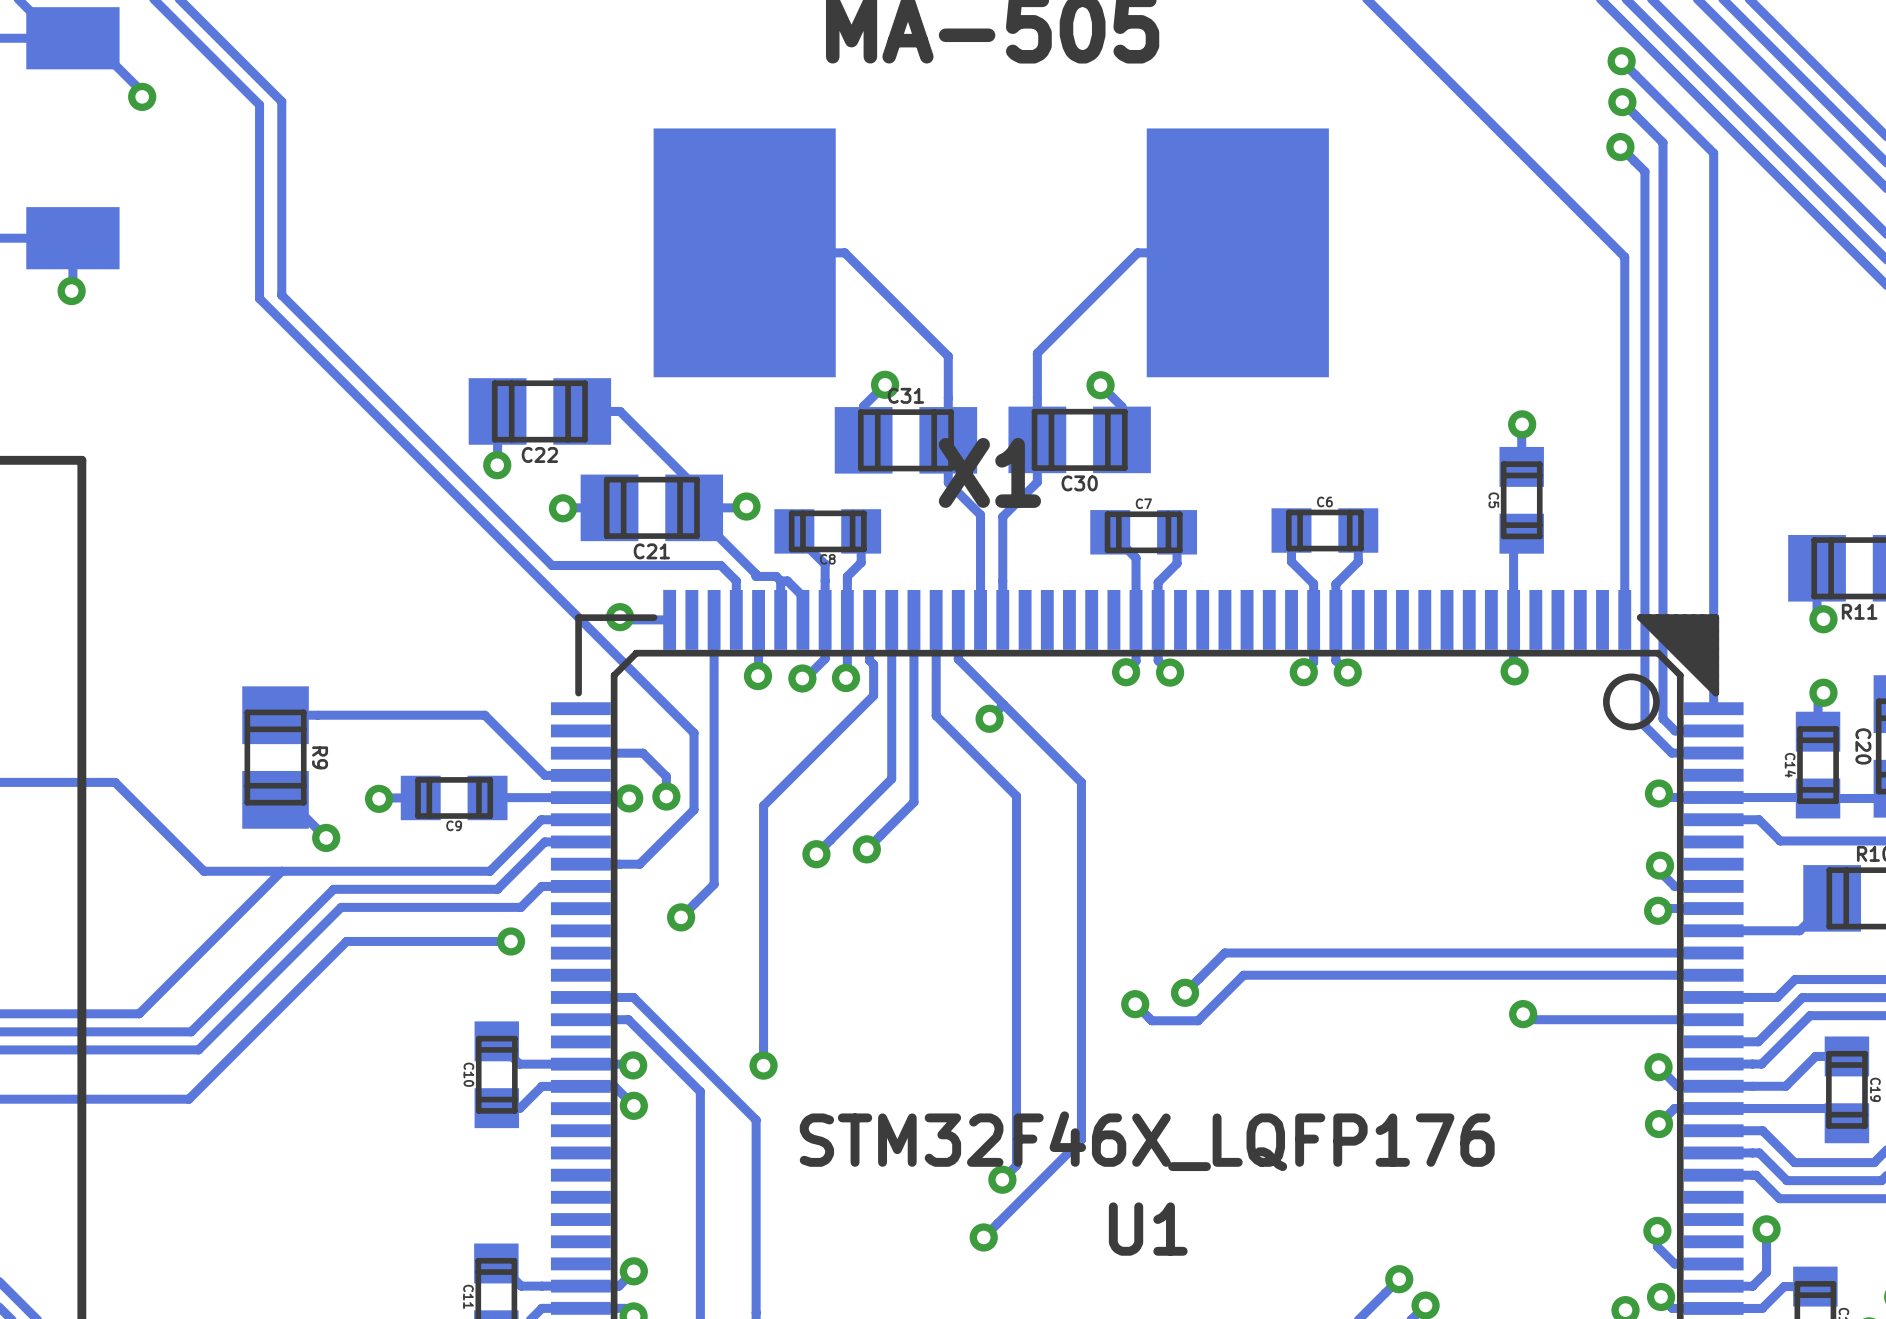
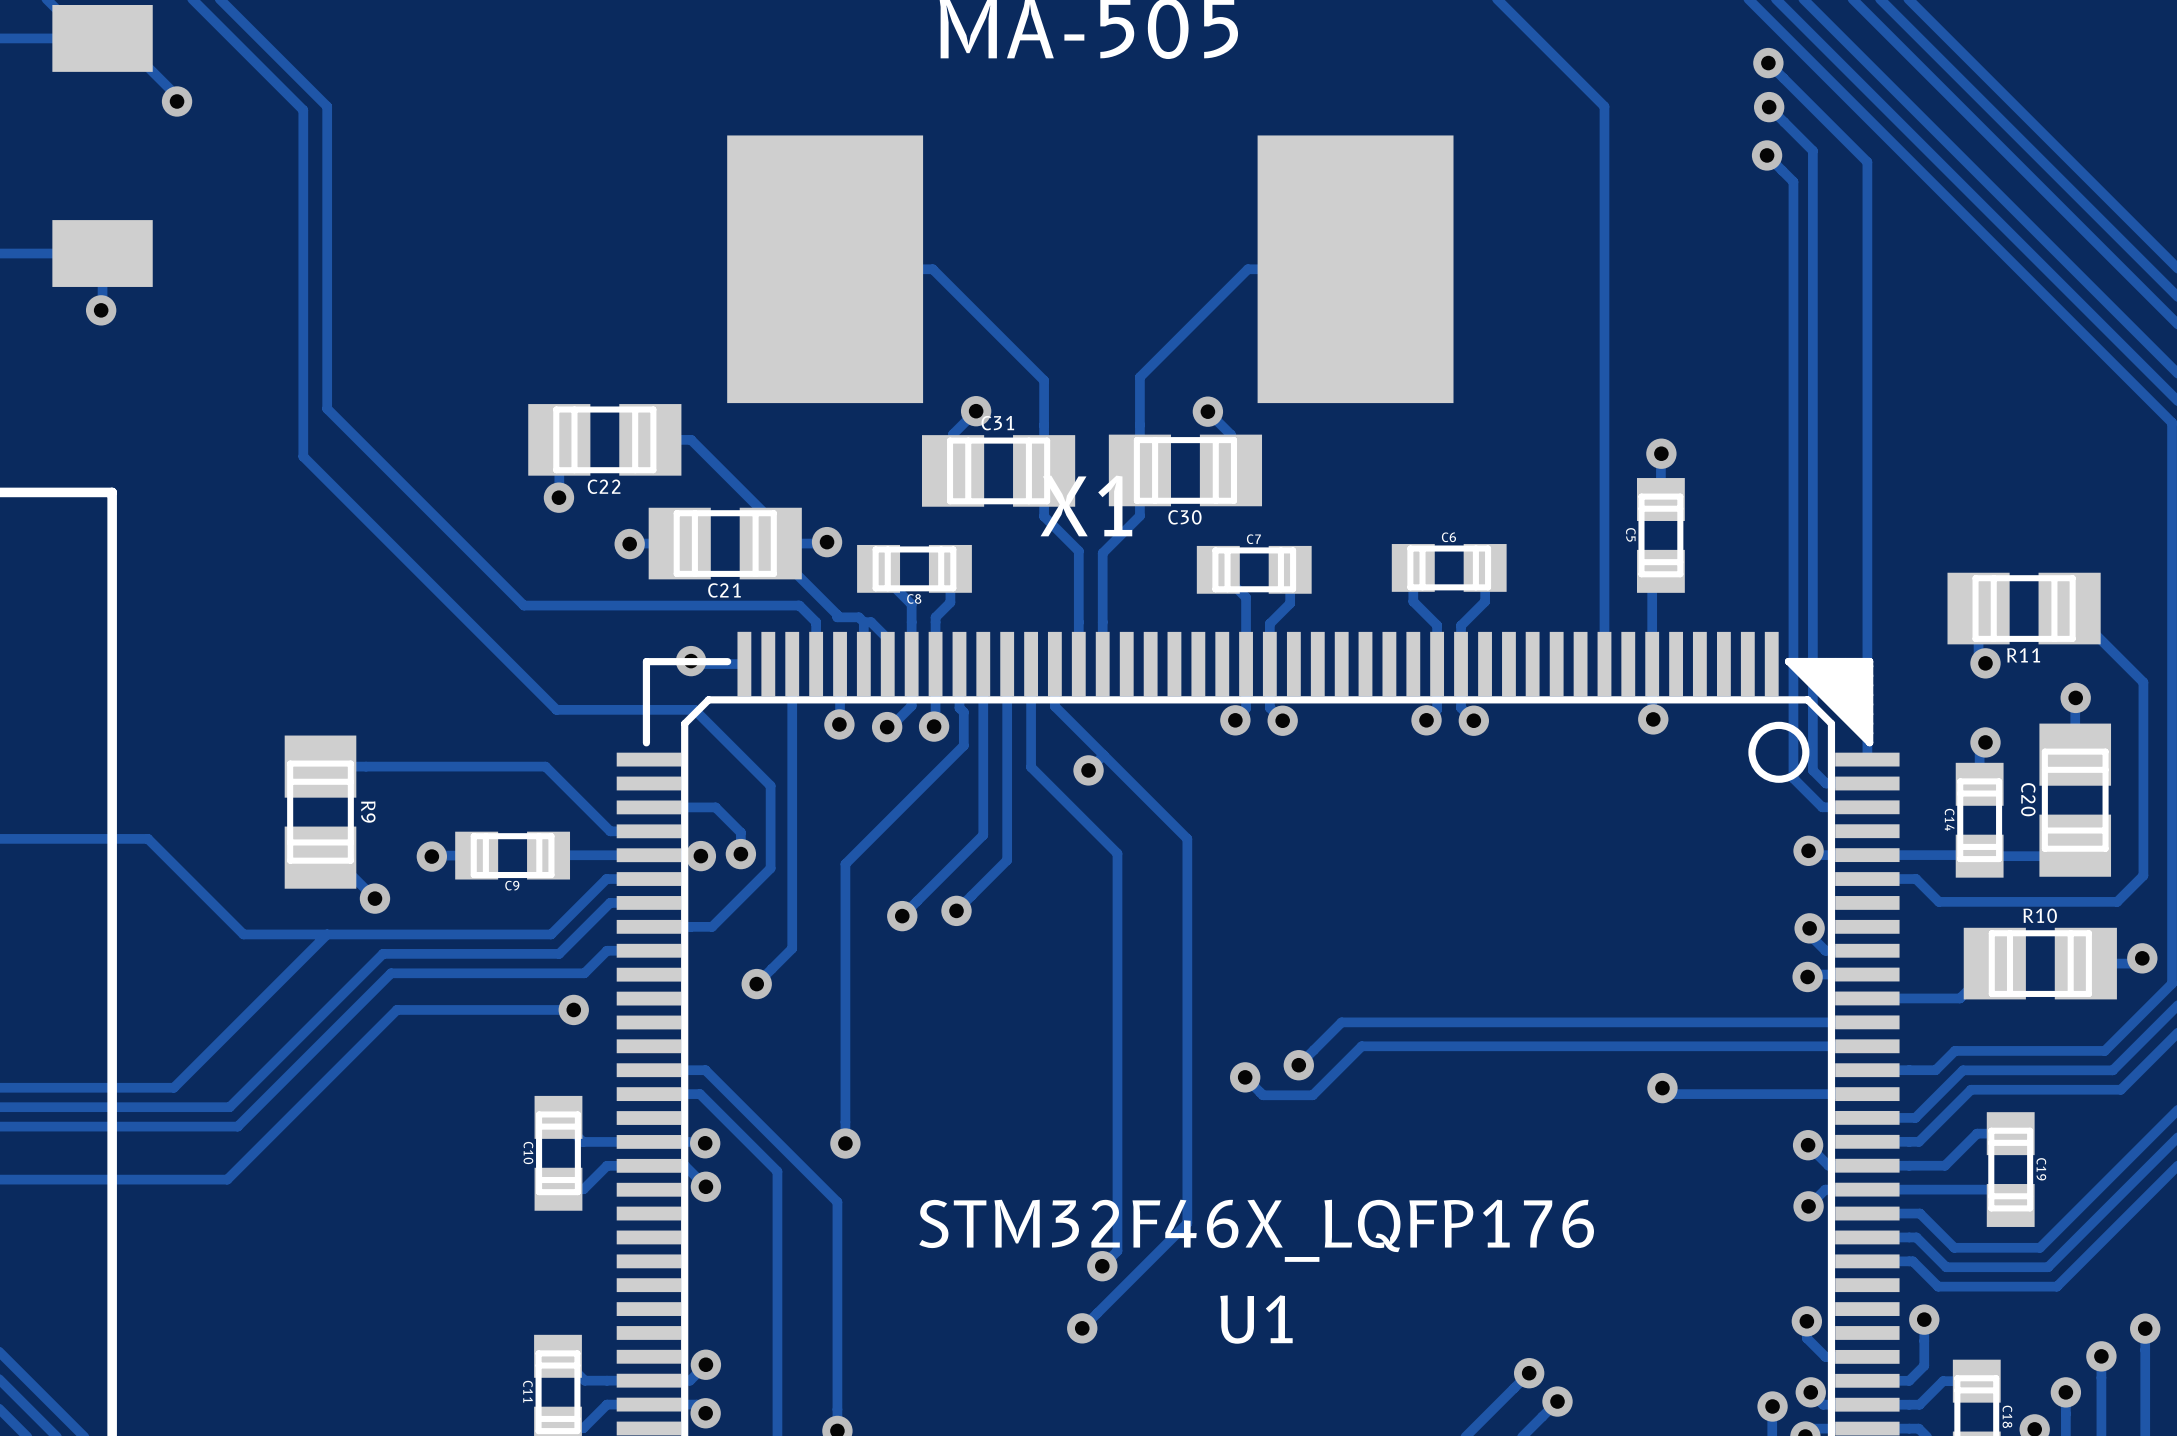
track: (1469, 101) (1624, 257) (1624, 619) -> (1604, 106) (1604, 664)
track: (281, 295) (551, 565) -> (327, 314) (327, 408) (523, 605) (617, 605)
track: (259, 298) (623, 662) -> (303, 318) (303, 456) (556, 709) (694, 709)

